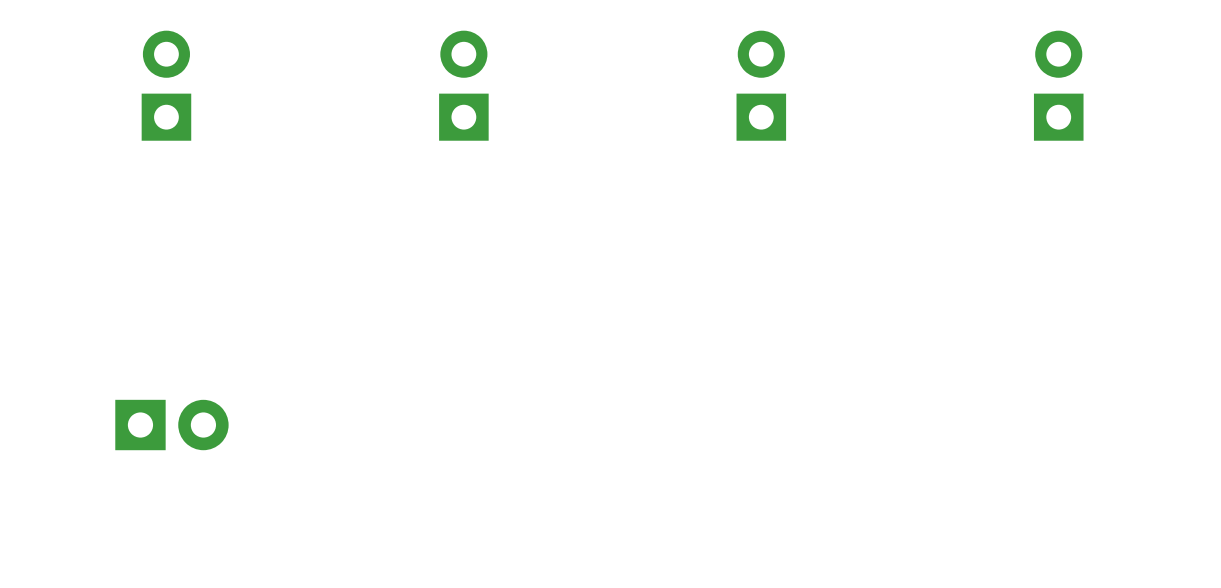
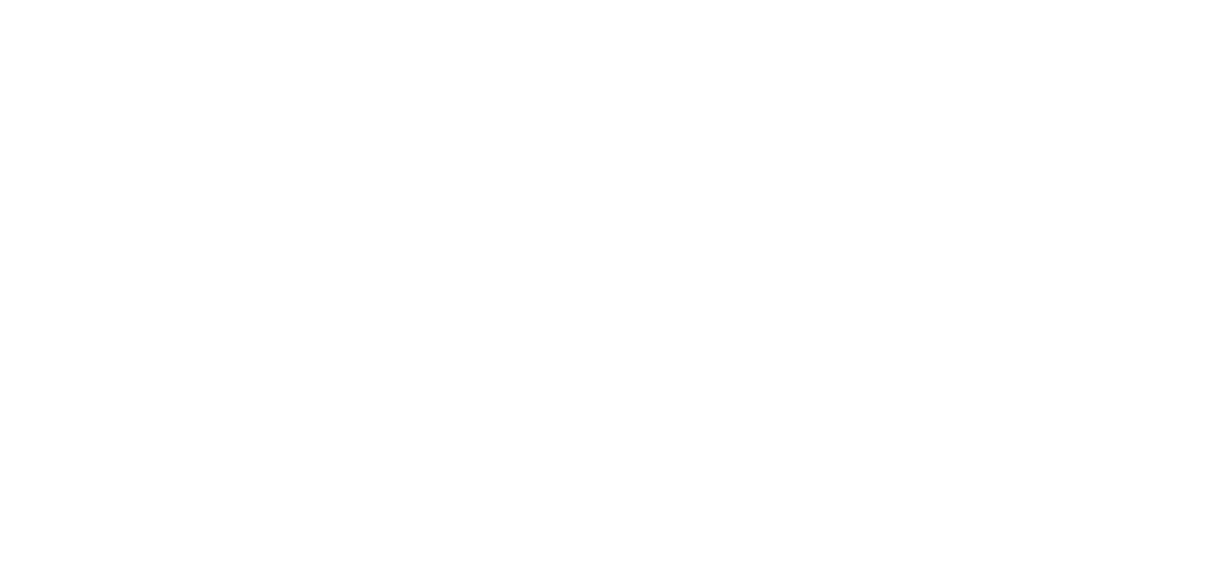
part: (166, 85) -> none
part: (463, 85) -> none
part: (761, 85) -> none
part: (1058, 85) -> none
part: (171, 425) -> none

